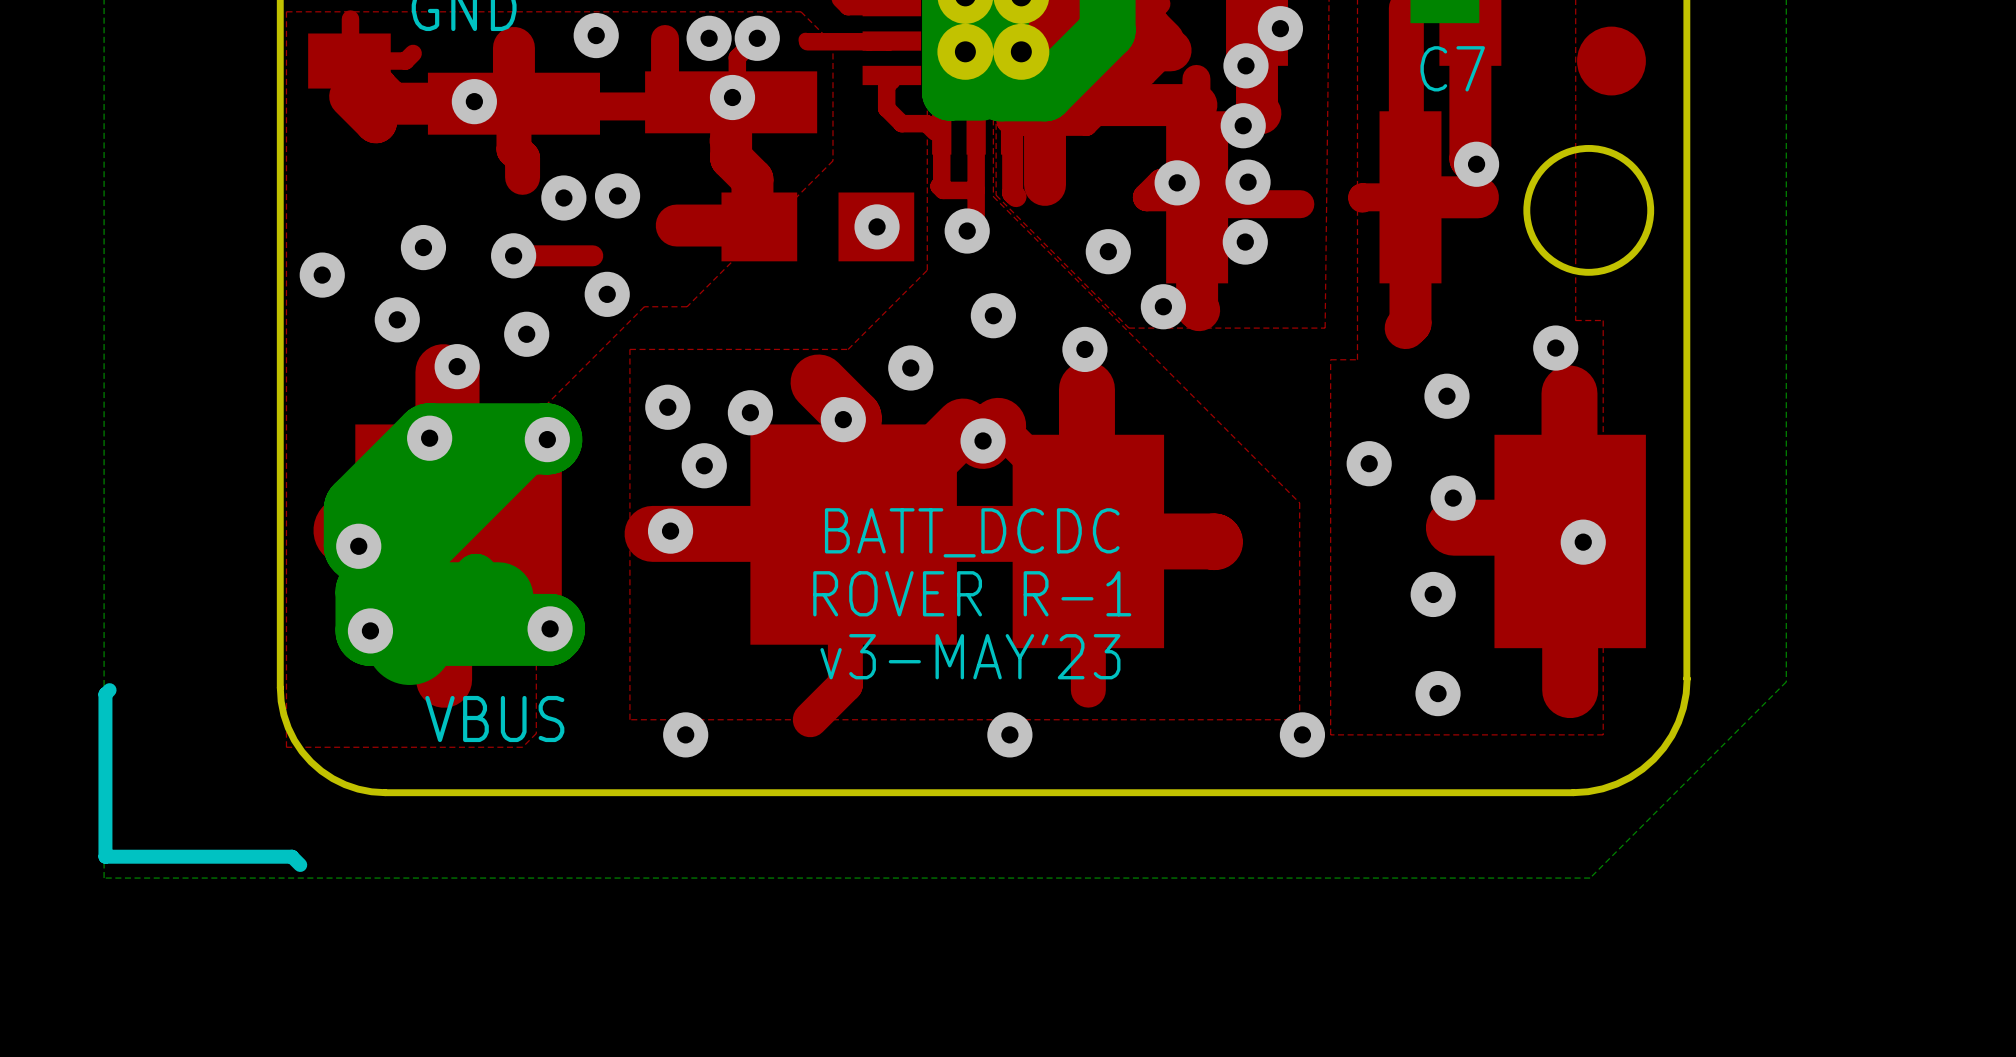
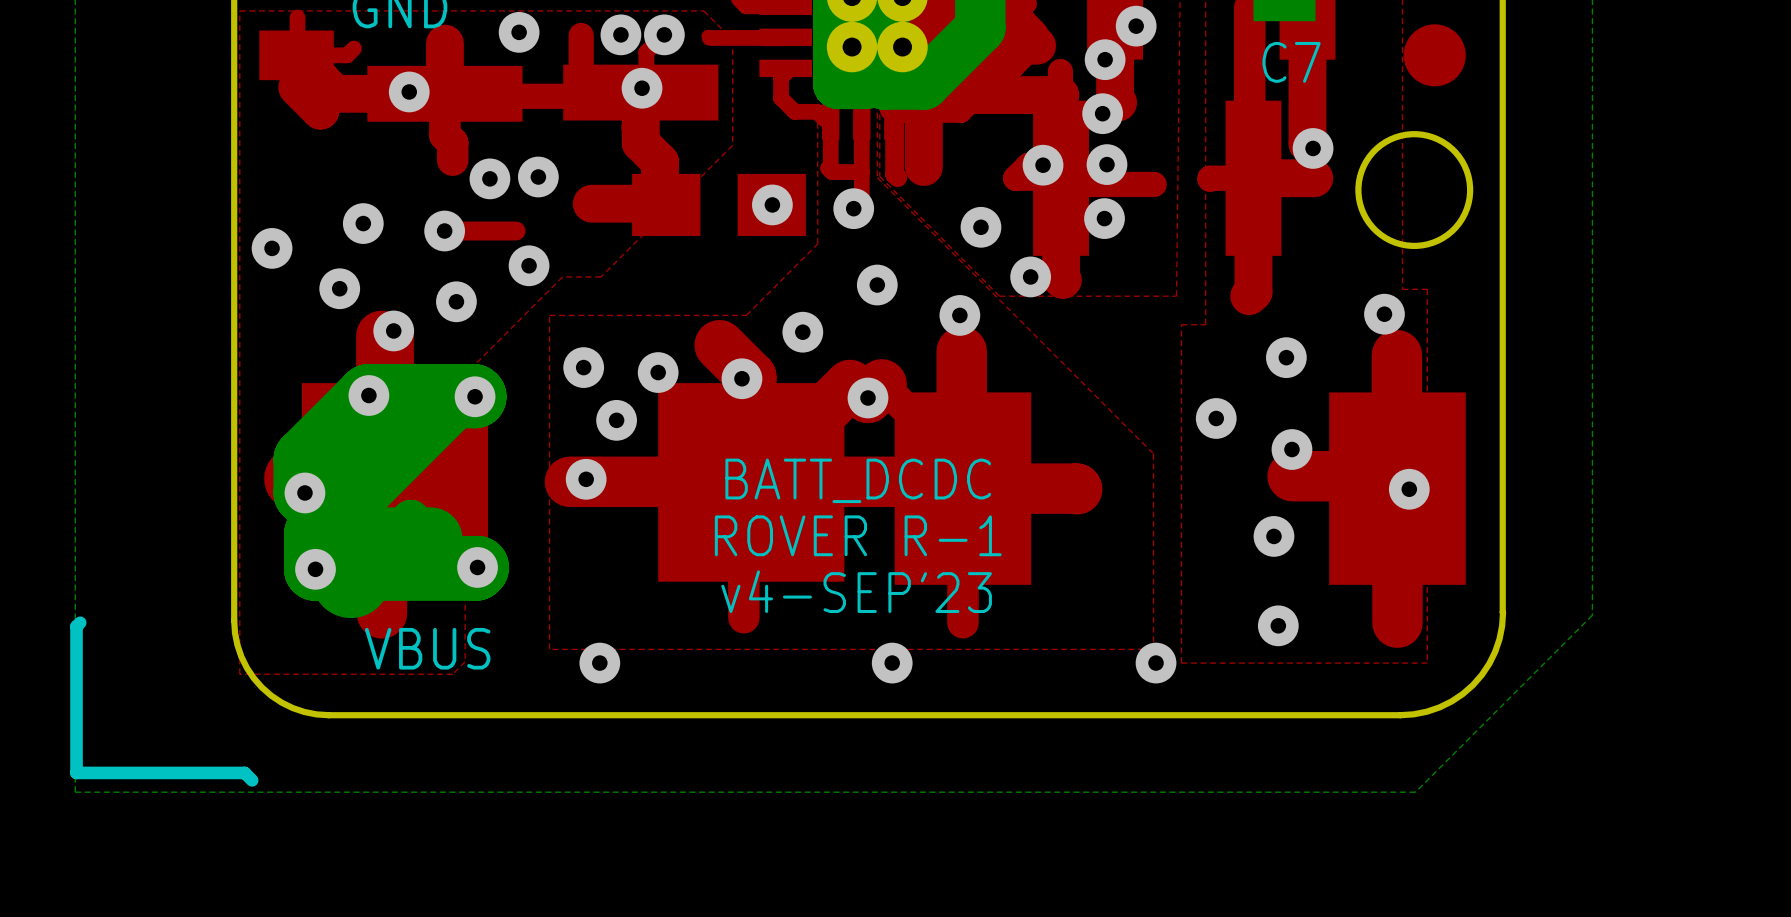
text: v3-MAY'23 (970, 656) -> v4-SEP'23 (856, 591)
top track: (845, 684) (810, 719) -> none

